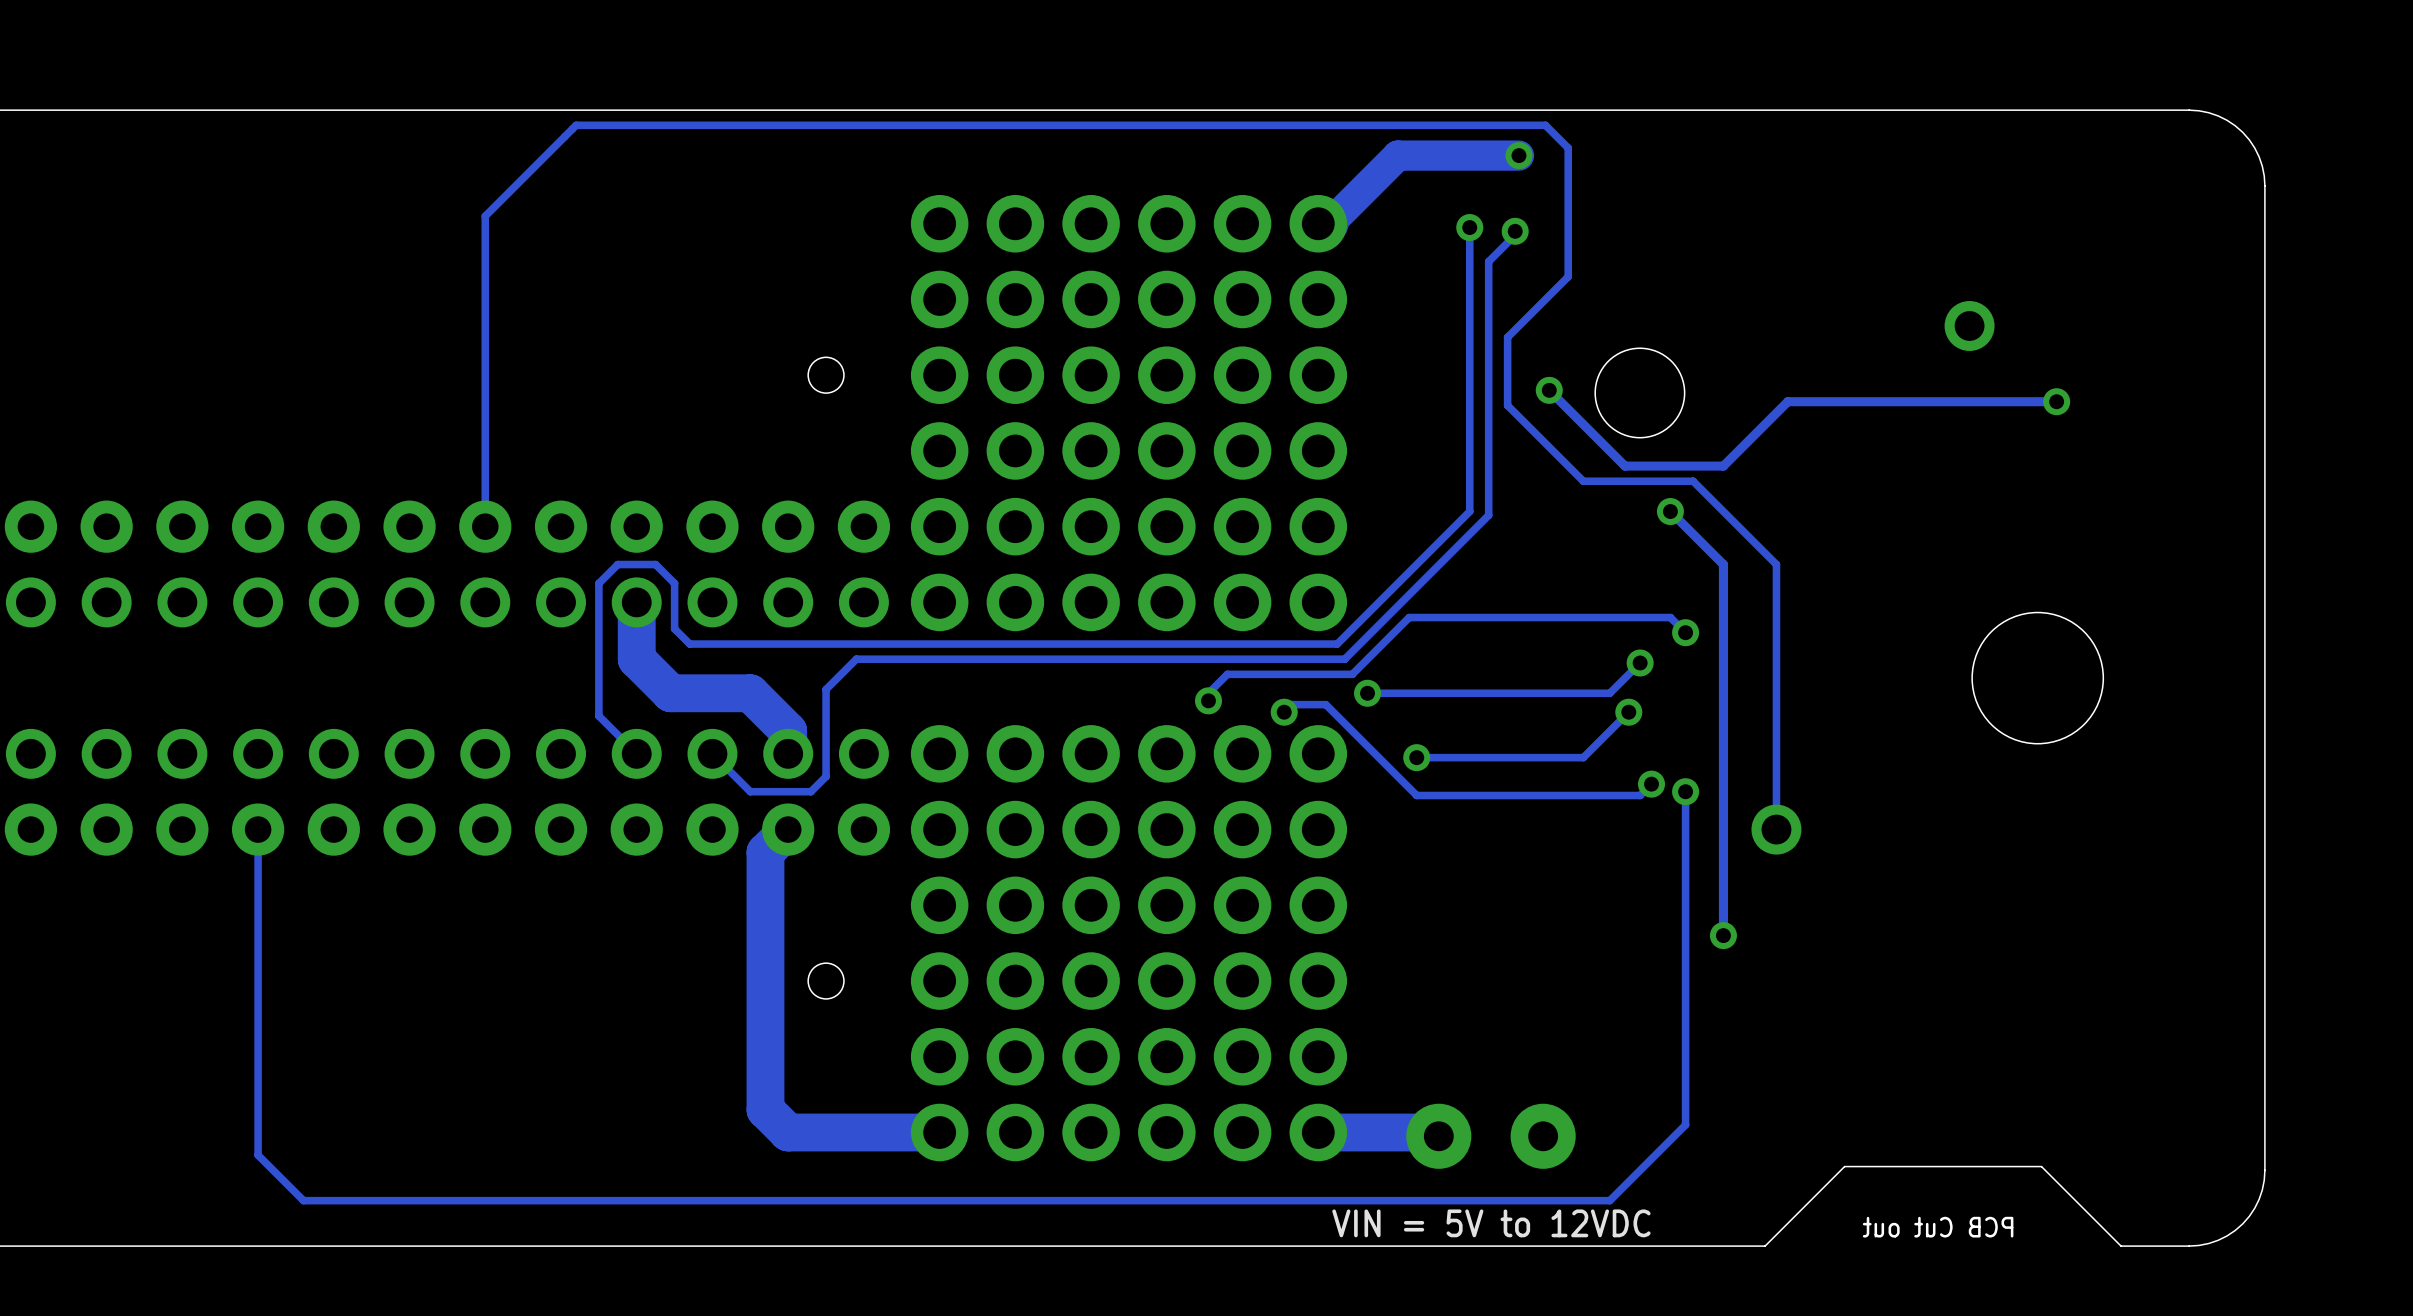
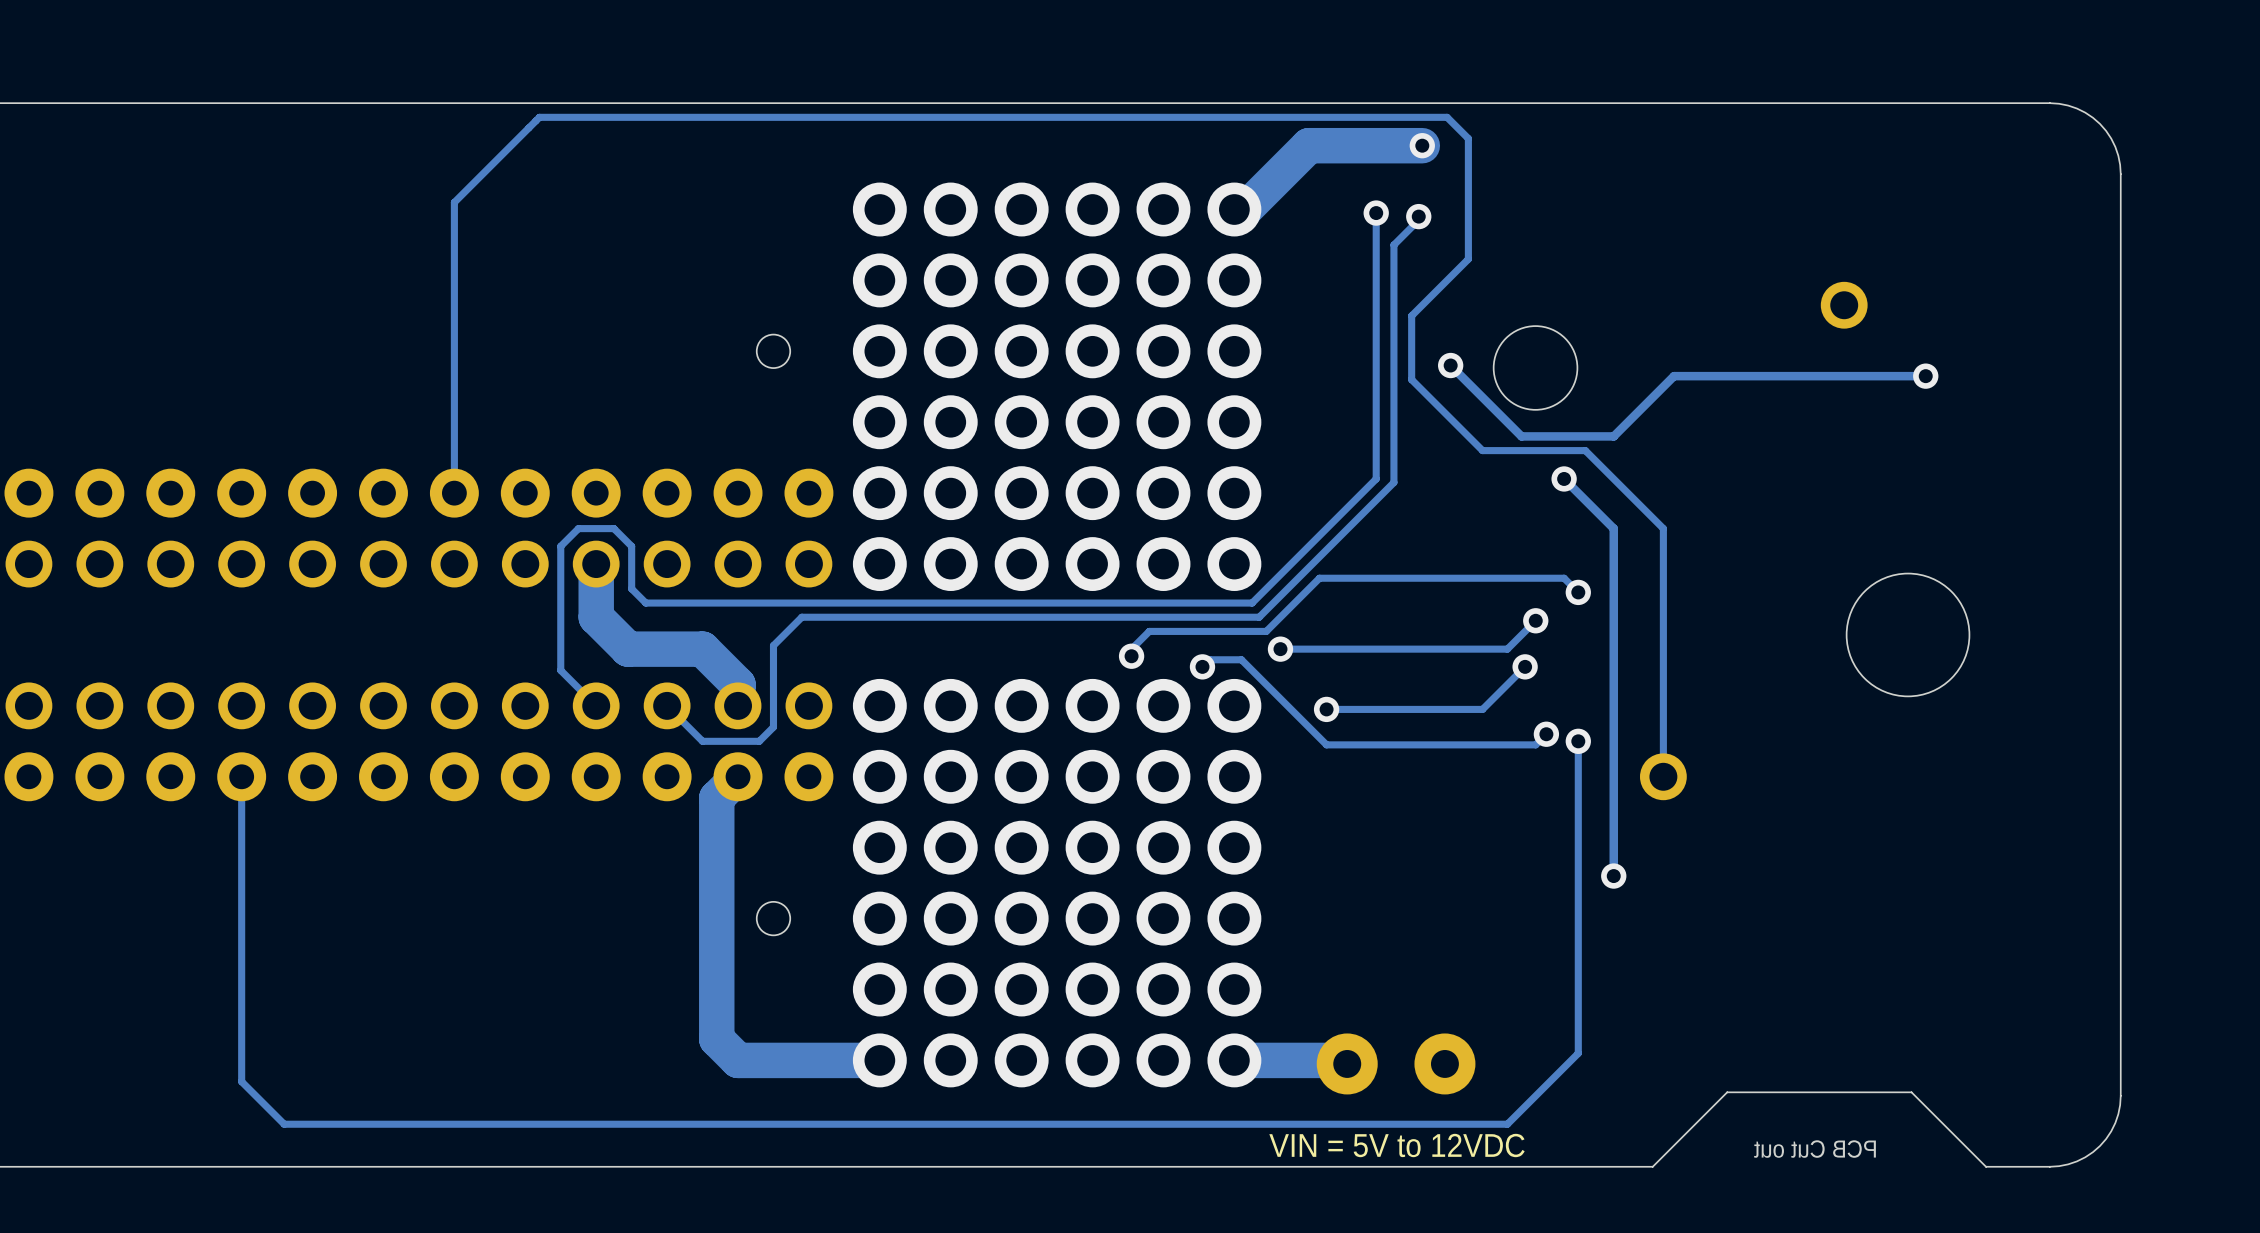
track width: thin (1518, 155) (1397, 155) (1329, 223) -> thick (1422, 145) (1308, 145) (1245, 209)

